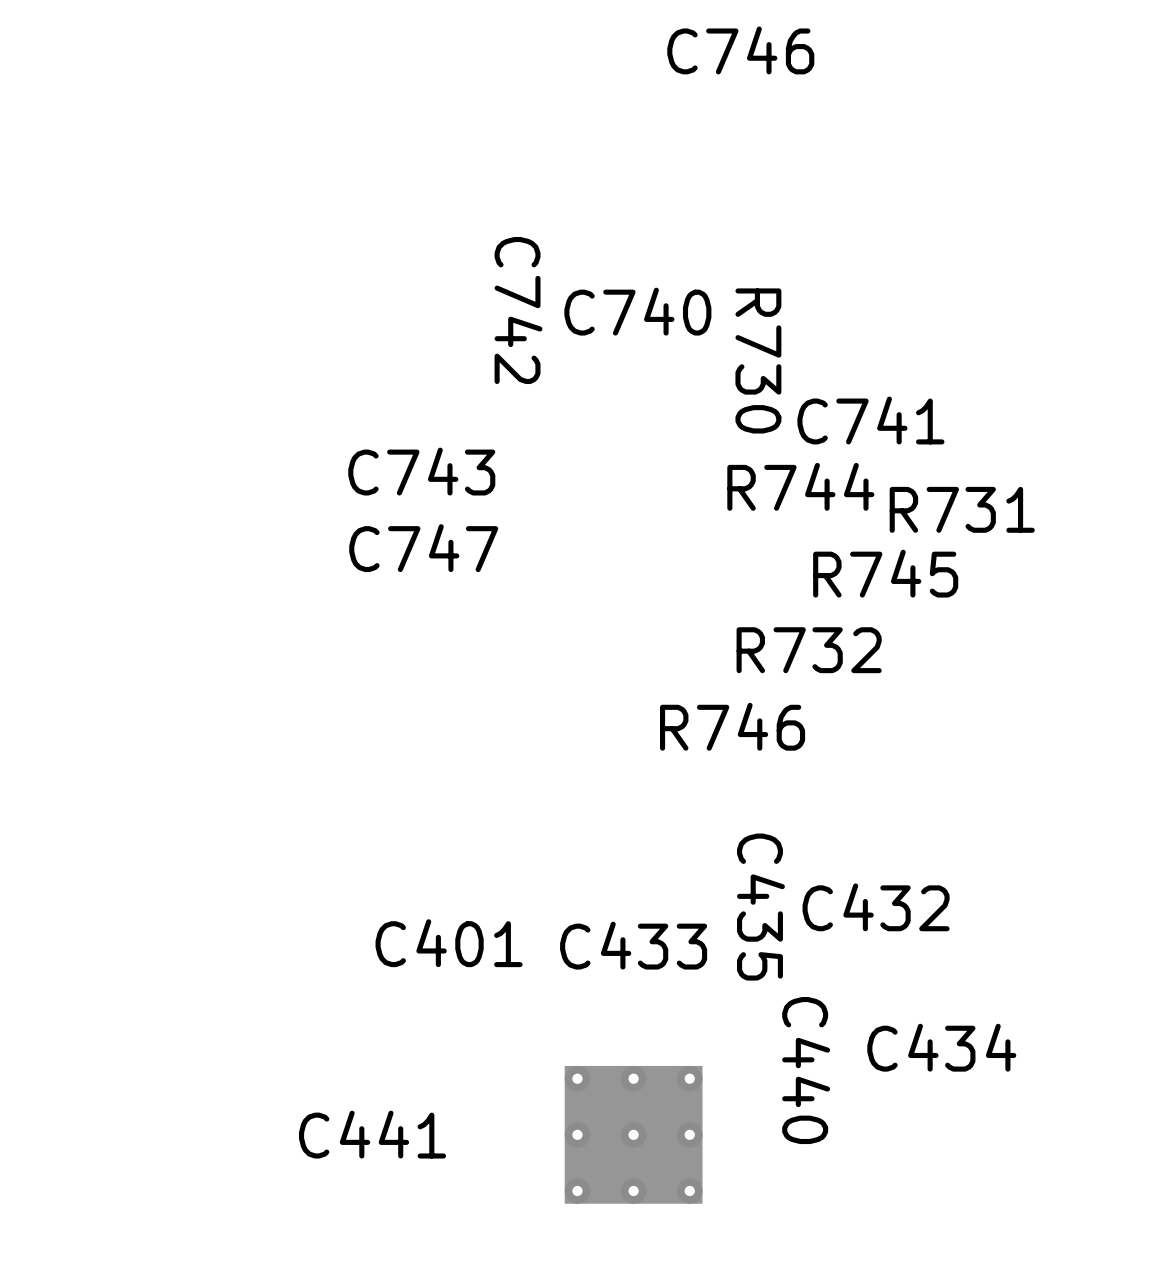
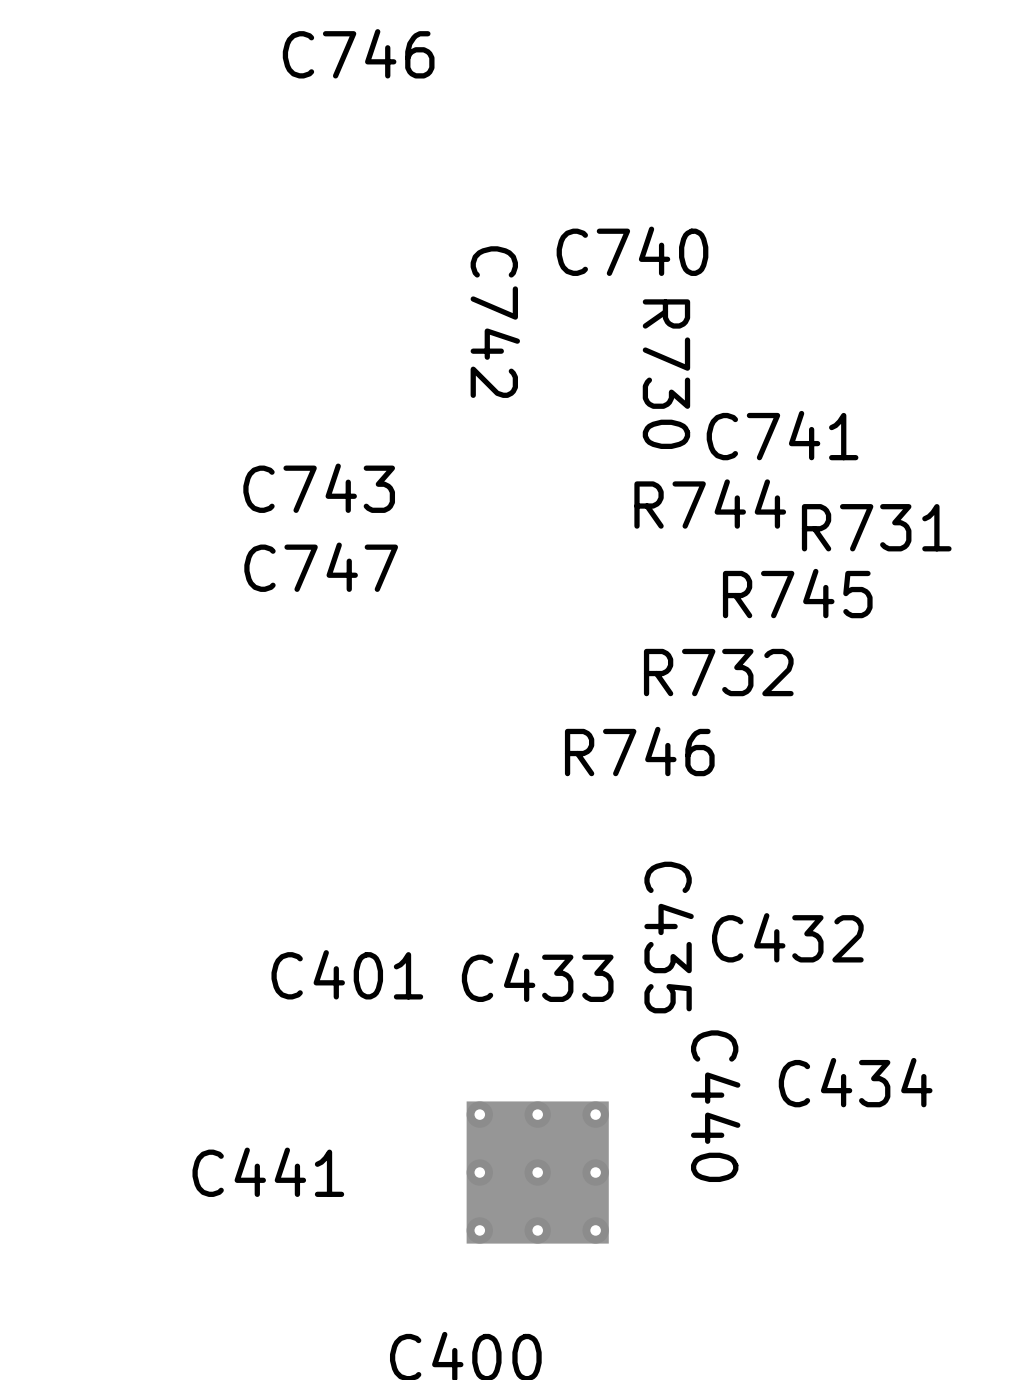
C746 position: (740, 50) -> (358, 53)
C742 position: (518, 310) -> (495, 322)
C740 position: (637, 311) -> (632, 251)

